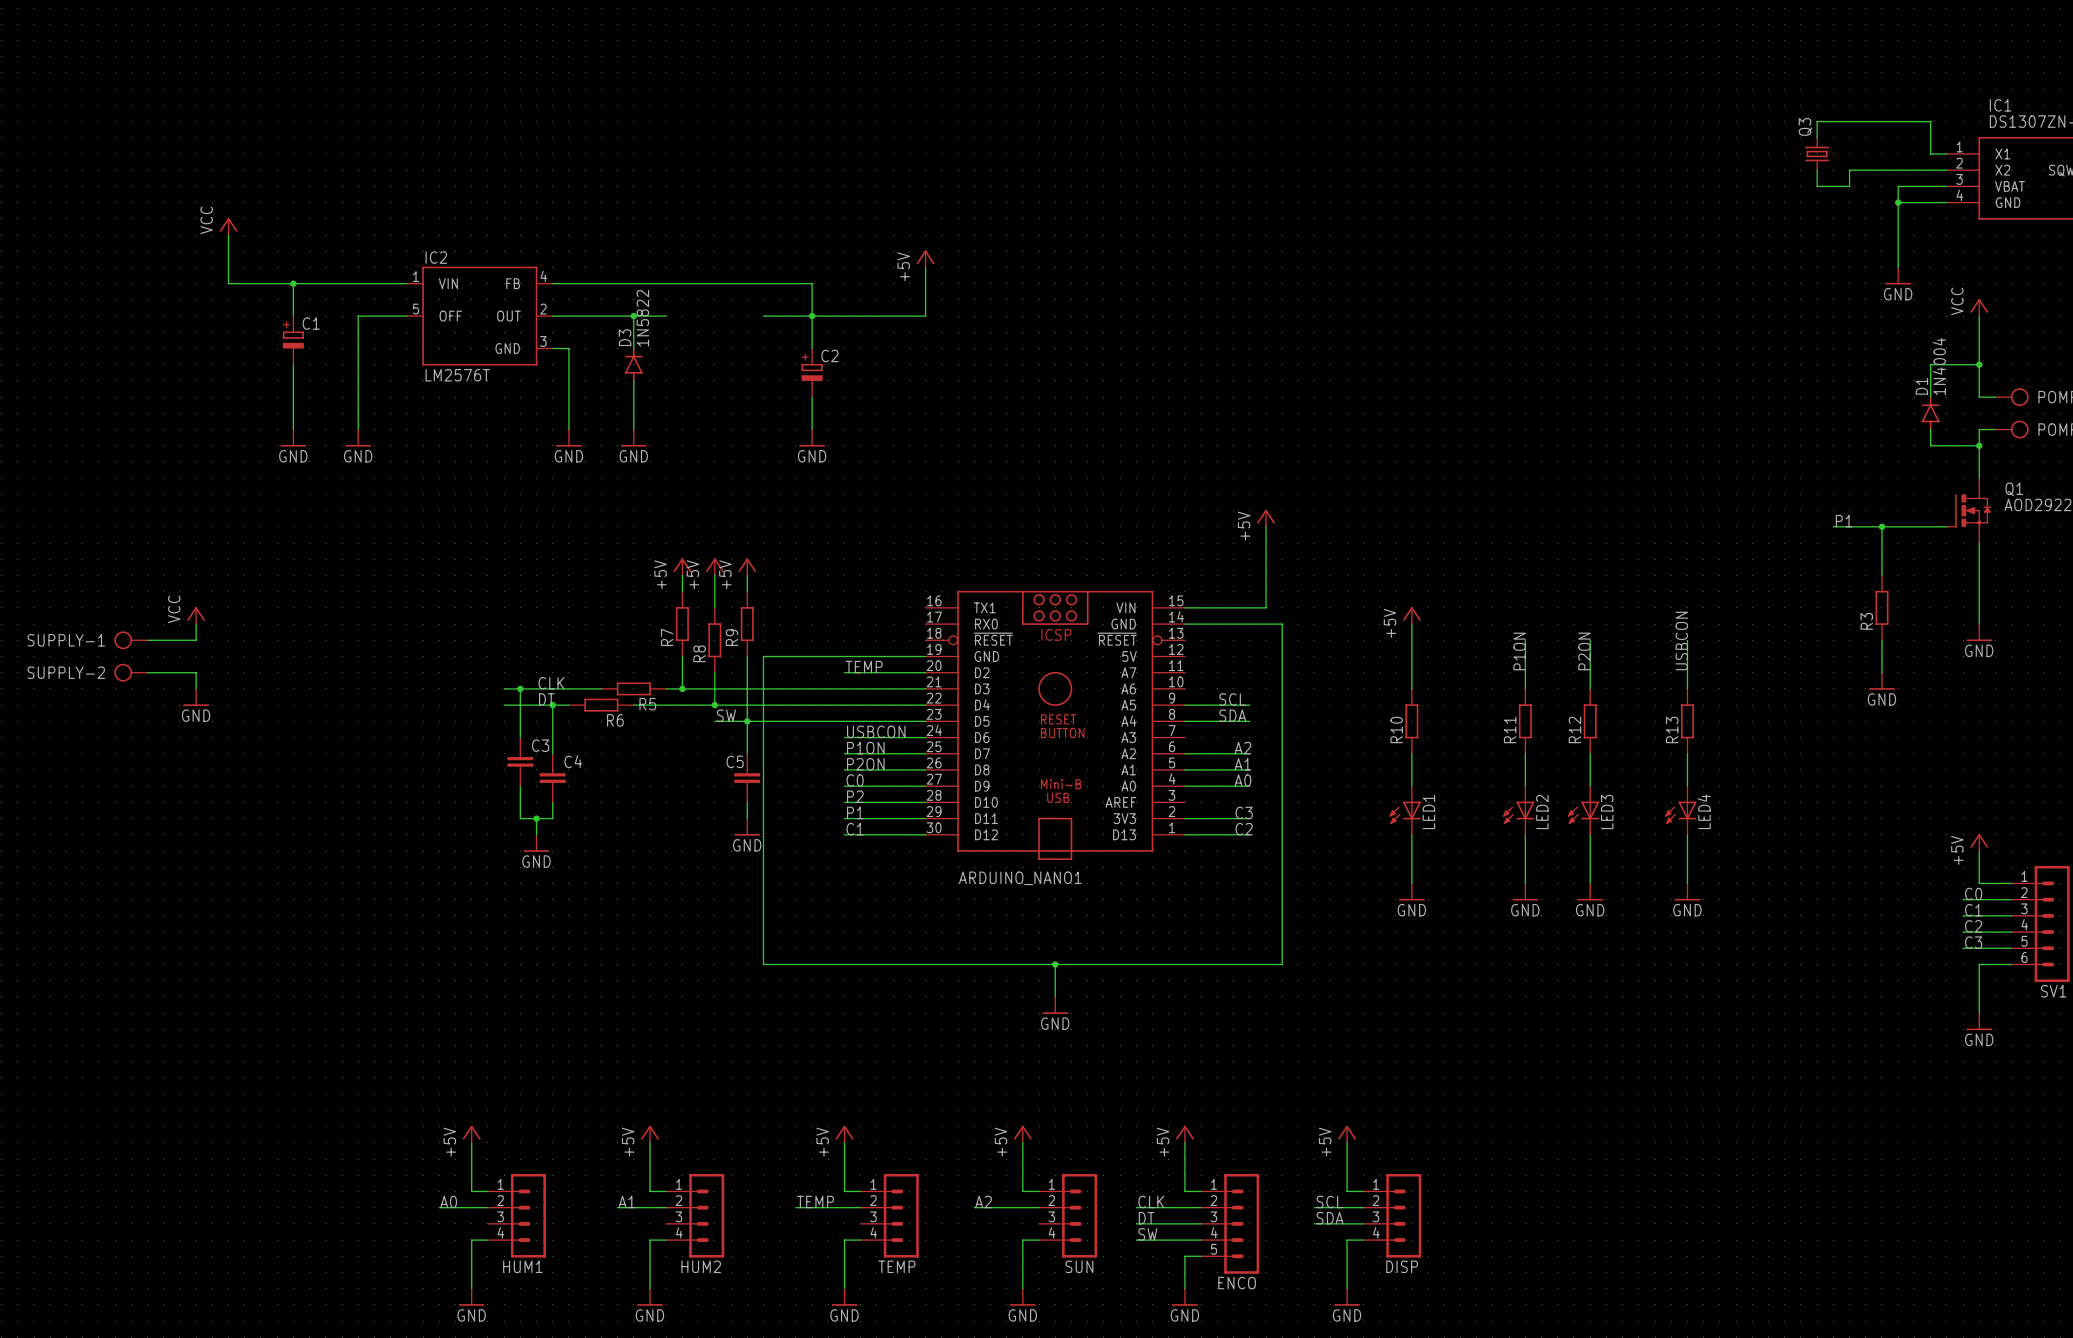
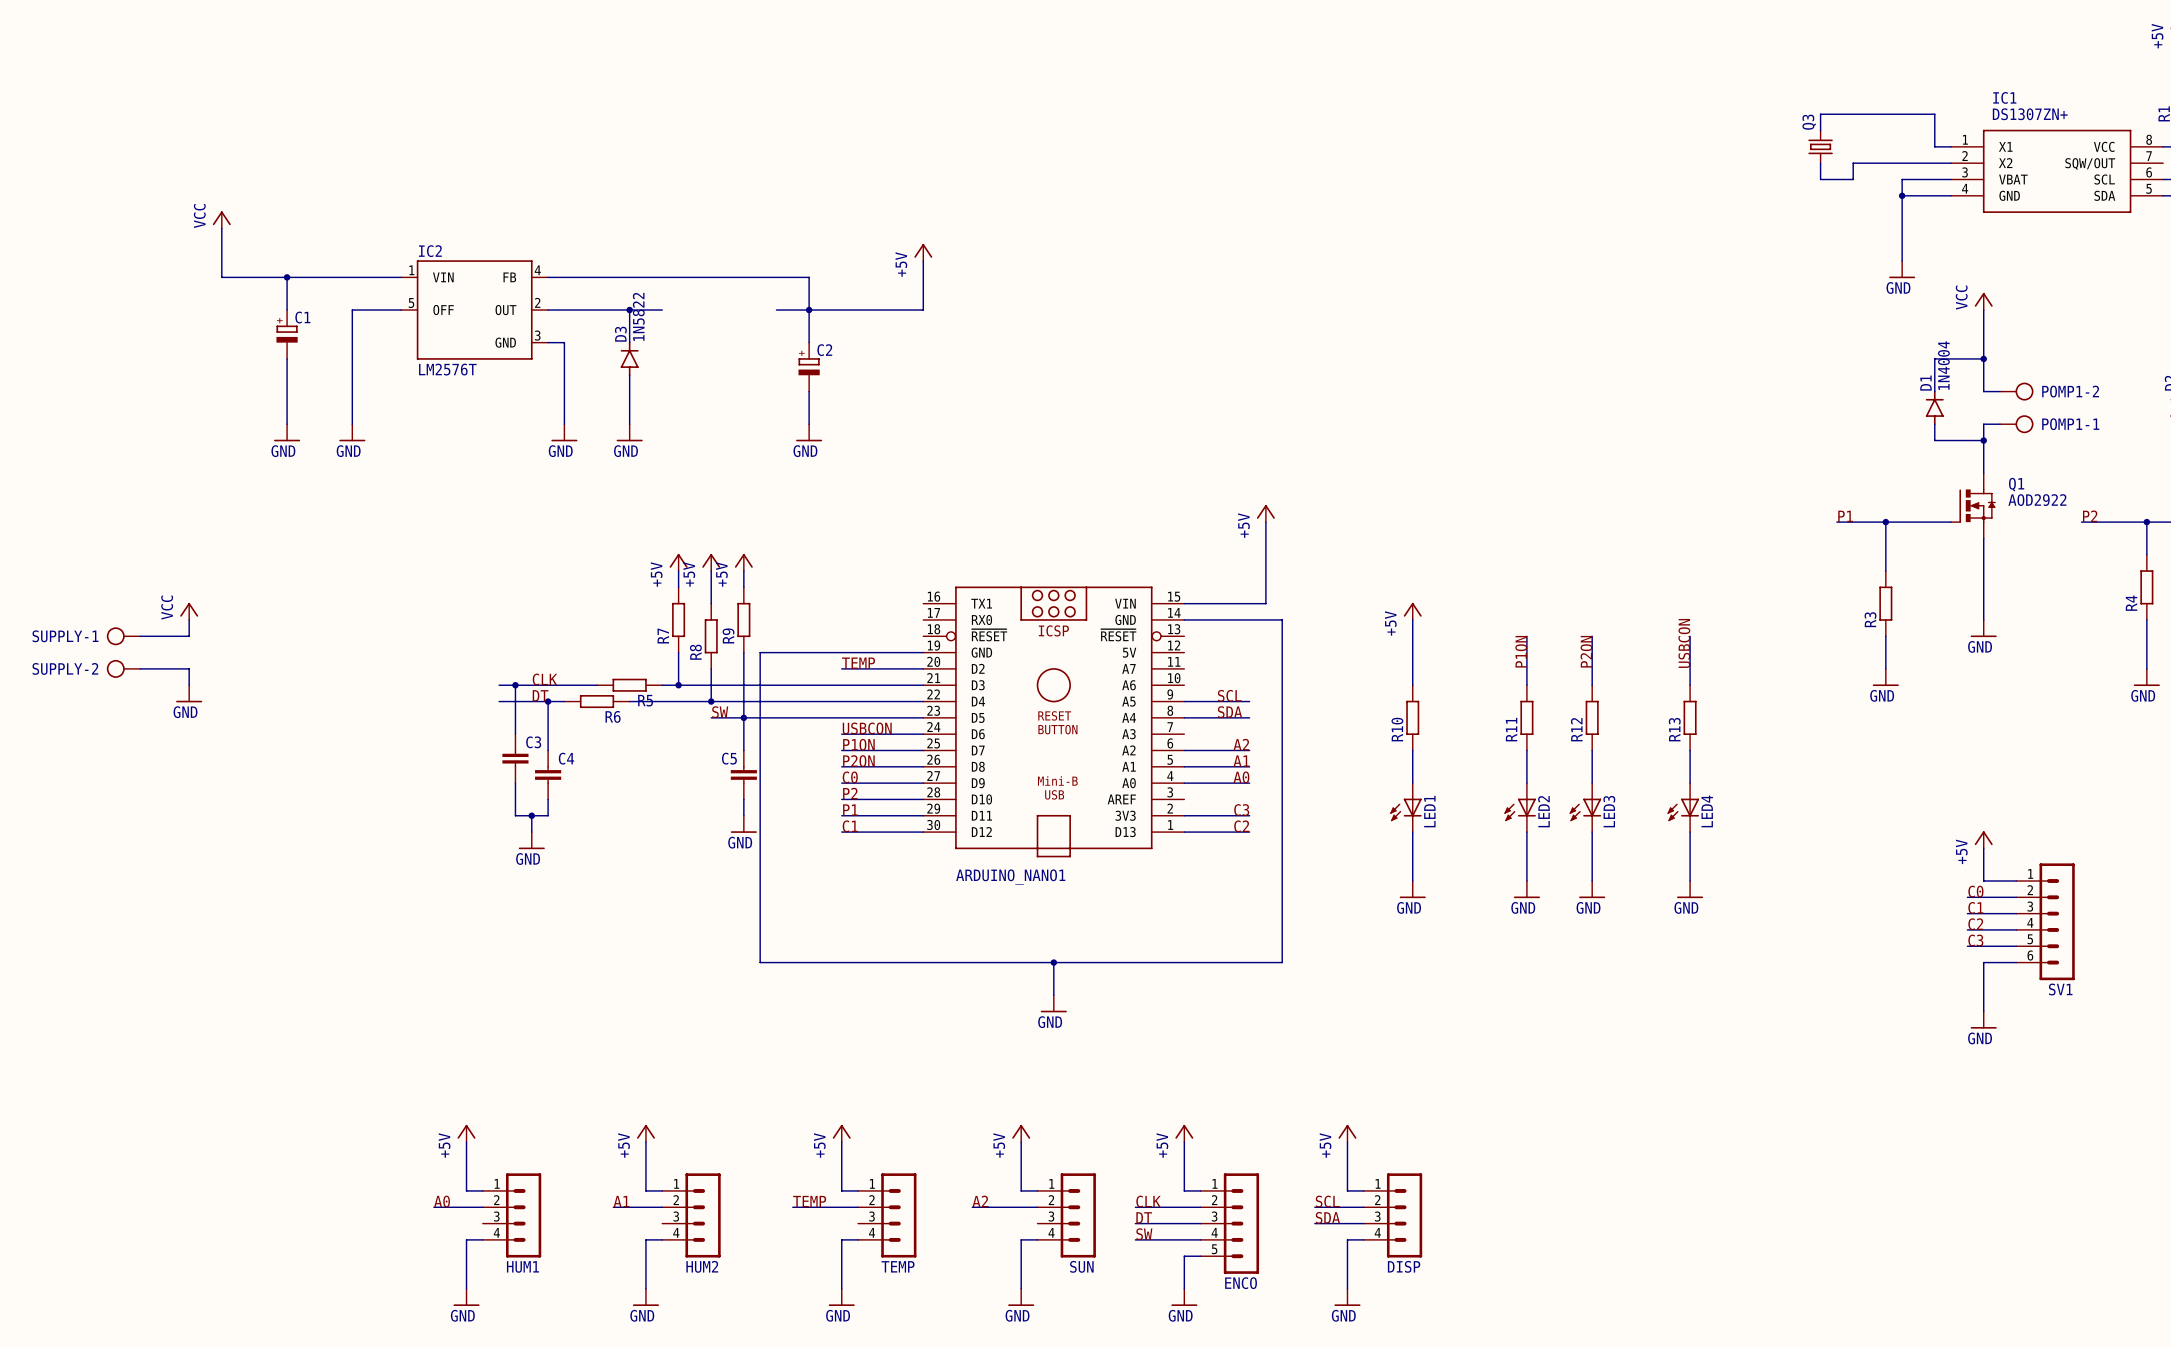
wire: (763, 316) (779, 316) -> none

